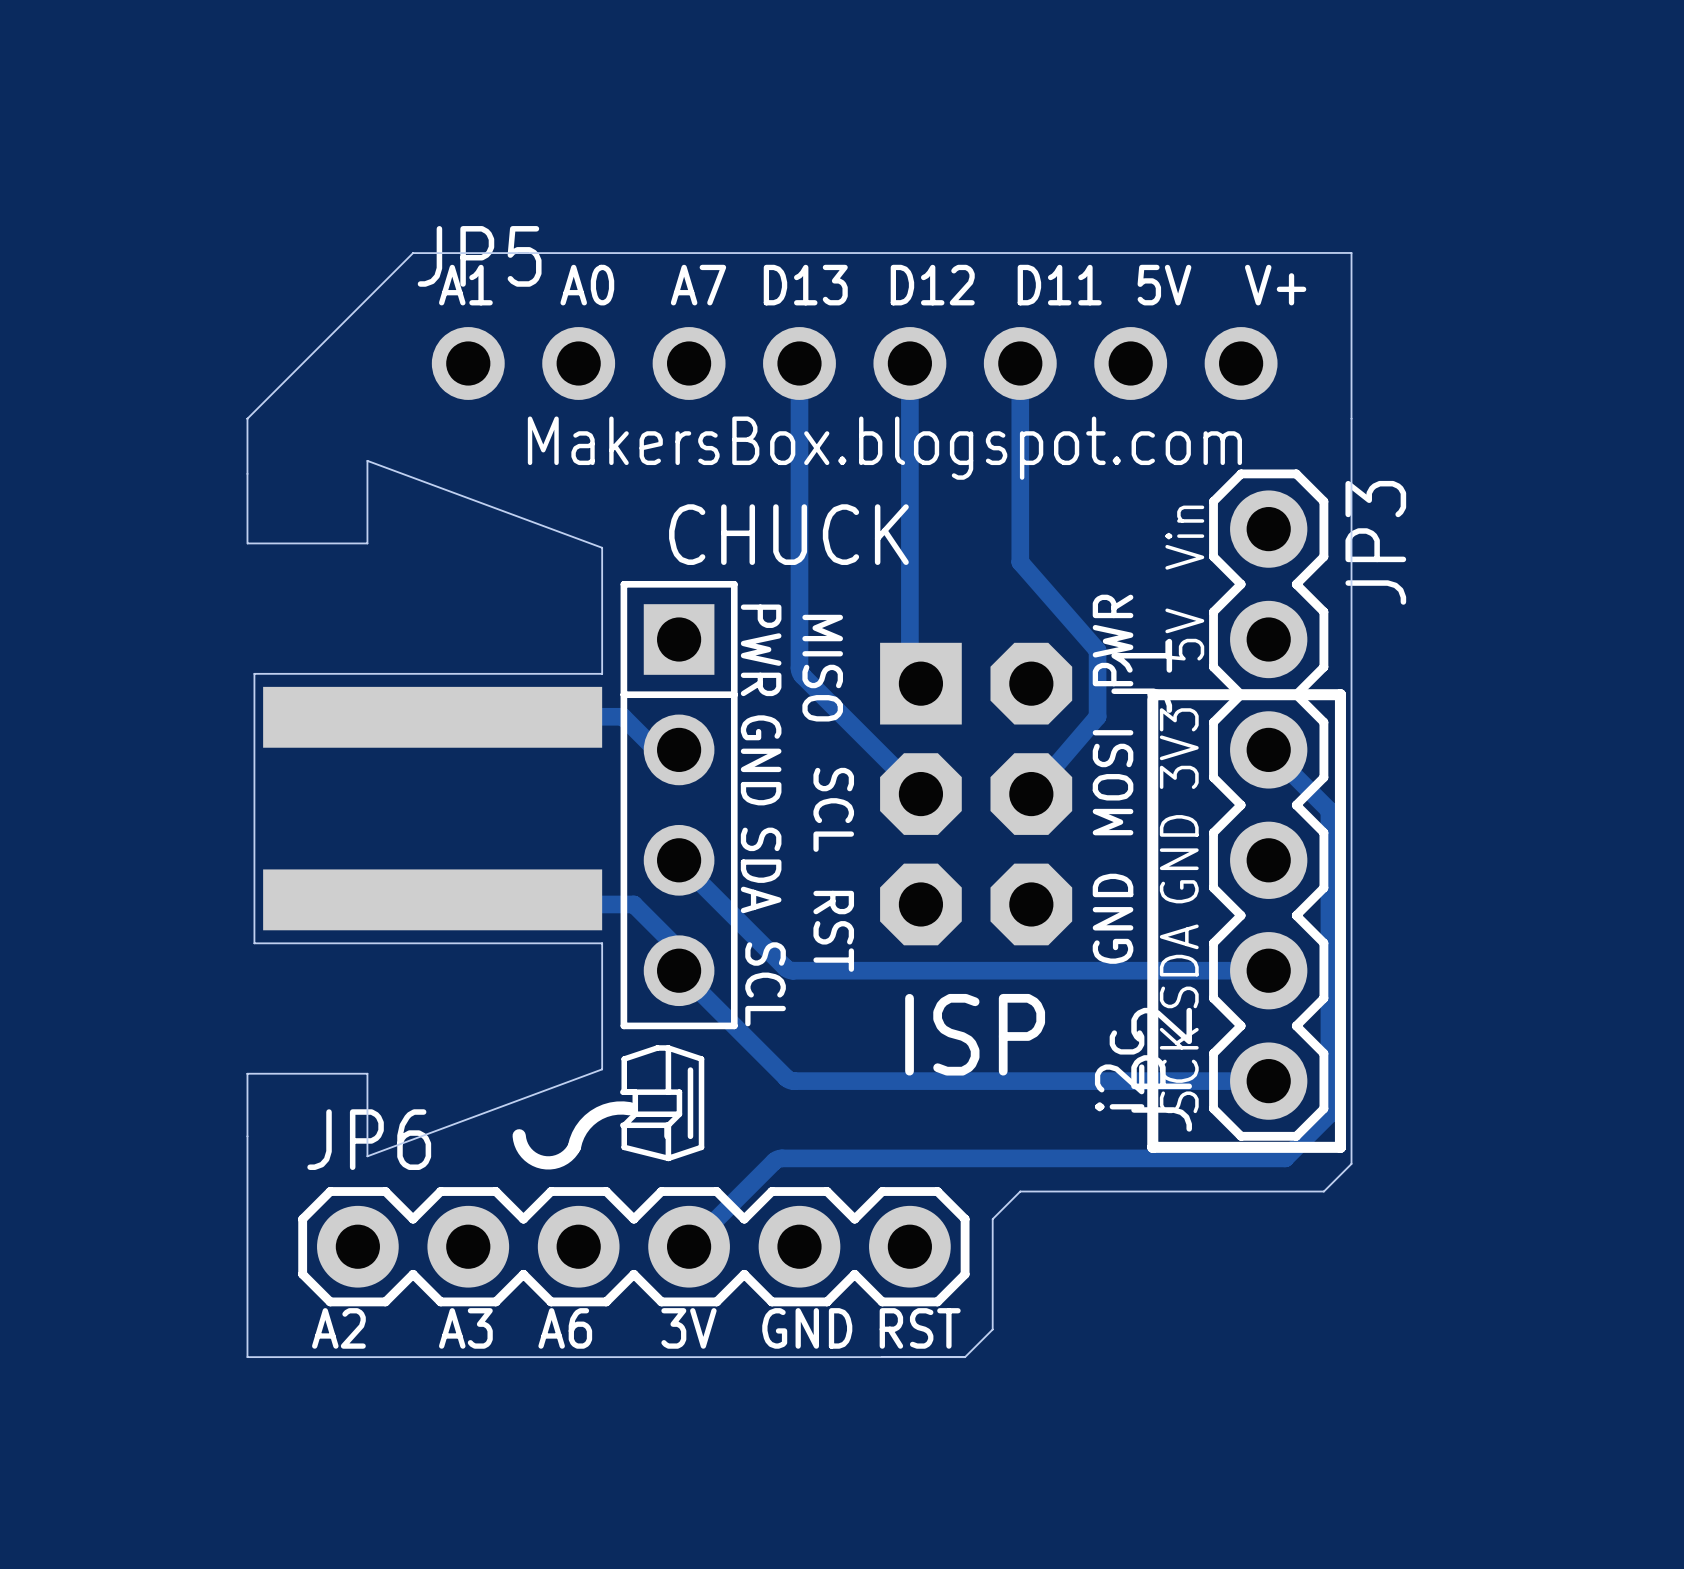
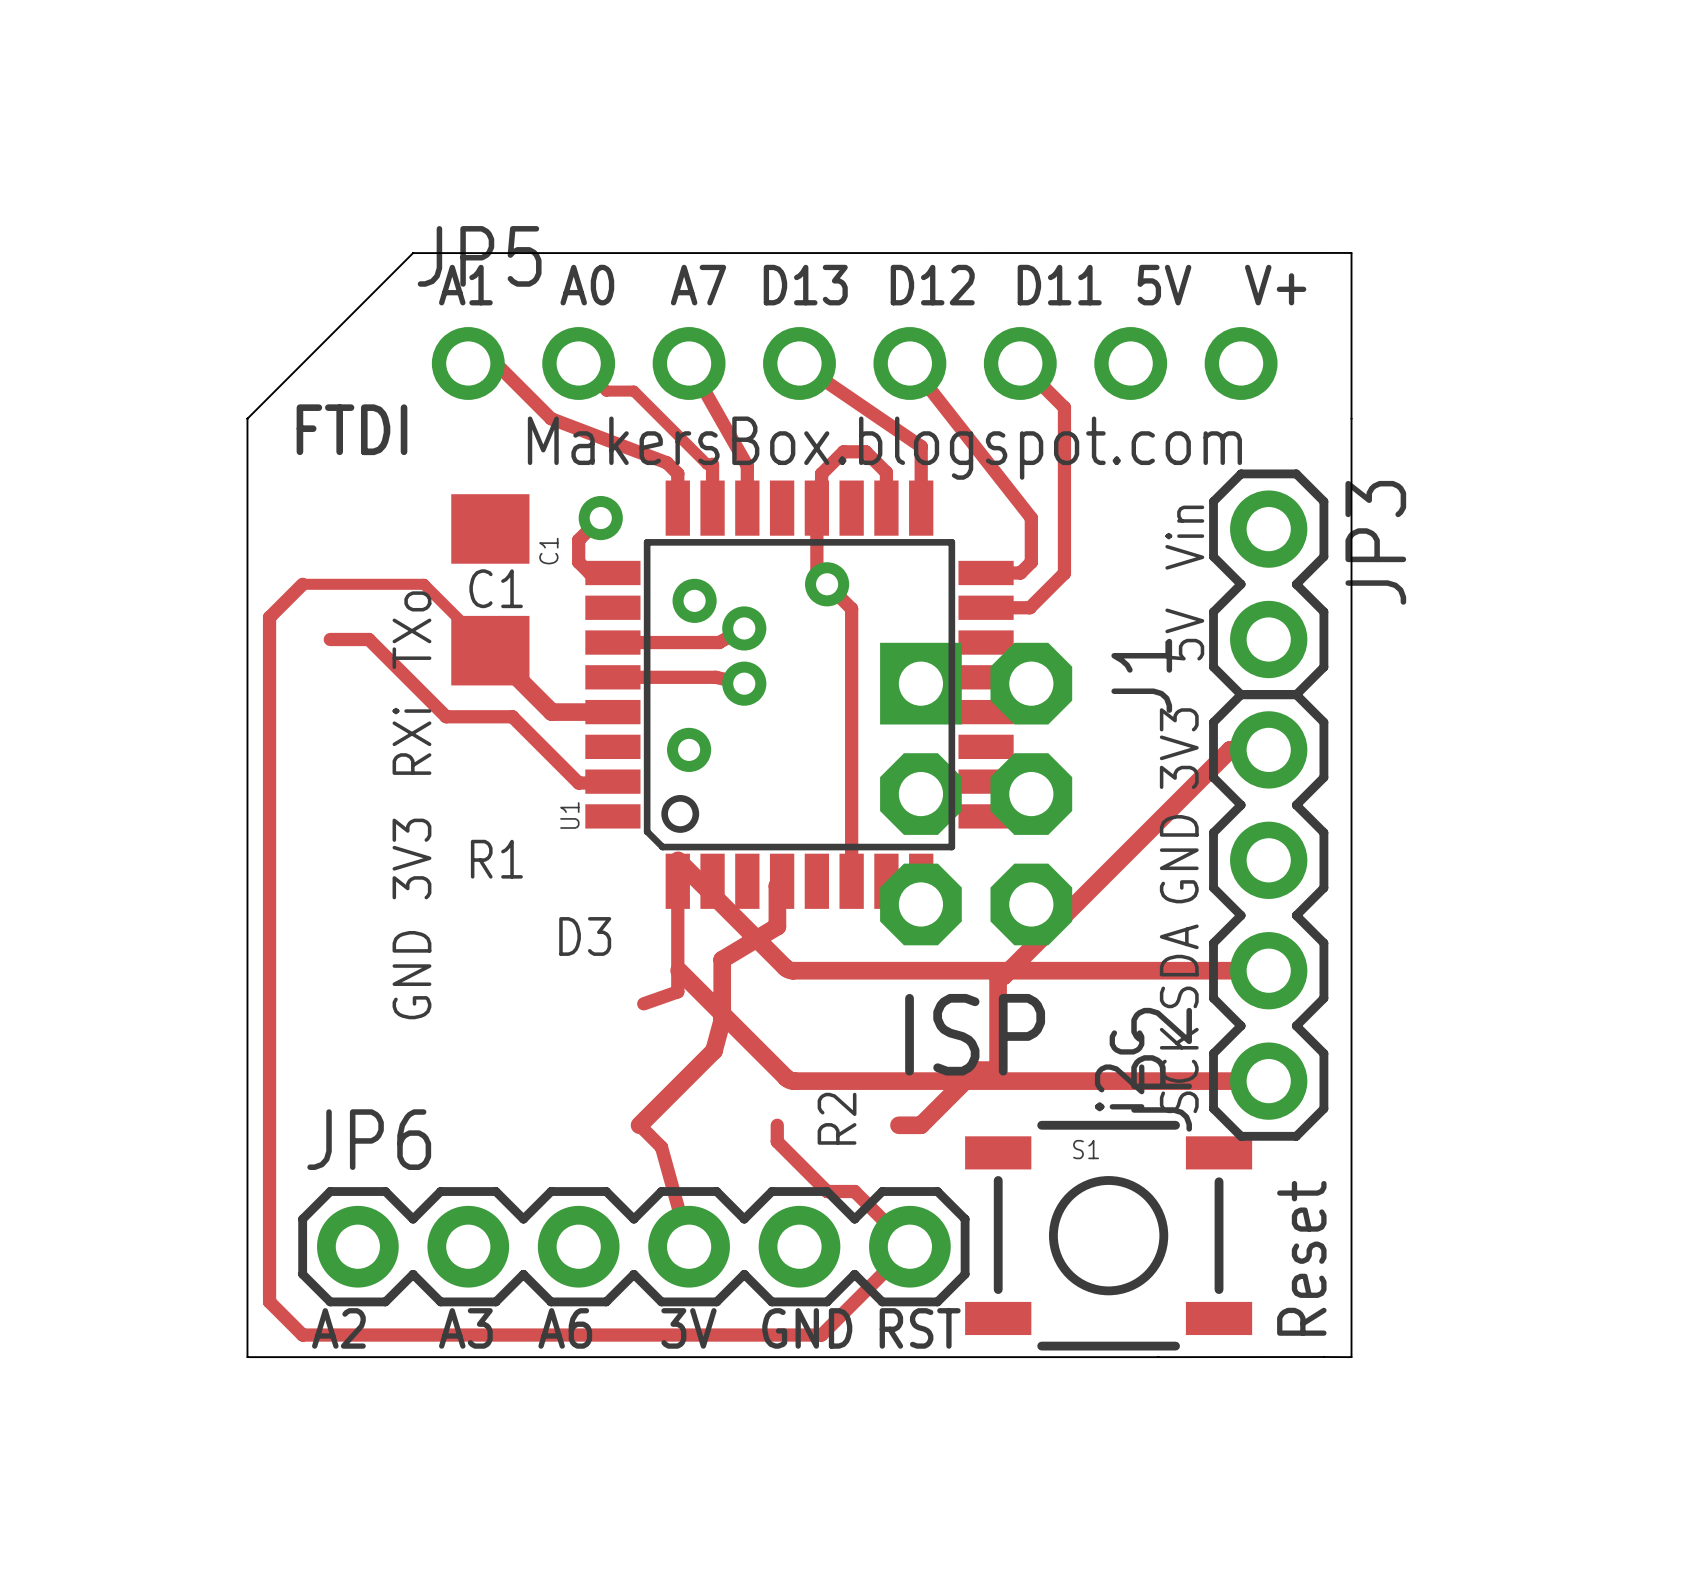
track: none -> (468, 363) (495, 363) (551, 418) (667, 462) (677, 473) (677, 508)
track: none -> (578, 363) (606, 391) (633, 391) (707, 464) (712, 464) (712, 508)
track: none -> (689, 363) (747, 465) (747, 508)
track: (799, 363) (799, 670) (920, 794) -> (799, 363) (921, 446) (921, 508)
track: (909, 363) (909, 668) (912, 674) (920, 683) -> (909, 363) (1031, 518) (1031, 562) (1020, 573) (986, 573)
track: (1020, 363) (1020, 562) (1097, 650) (1097, 716) (1031, 794) -> (1020, 363) (1064, 407) (1064, 573) (1029, 607) (986, 607)
text: none -> FTDI (351, 429)
board edge: none -> (247, 473) (247, 1136)
track: none -> (886, 508) (886, 472) (865, 451) (843, 451) (821, 473) (821, 503) (816, 508) (816, 574) (851, 608) (851, 881)
track: none -> (600, 518) (578, 540) (578, 562) (589, 573) (612, 573)
via: none -> (600, 518)
via: none -> (827, 584)
text: none -> C1 (496, 588)
C1: none -> (490, 589)
via: none -> (694, 600)
track: none -> (744, 628) (719, 642) (612, 642)
via: none -> (744, 628)
text: none -> TXo (411, 630)
track: none -> (330, 639) (368, 639) (446, 716) (512, 716) (578, 783) (612, 781)
text: PWR (1113, 640) -> none
text: MISO (822, 668) -> none
track: none -> (612, 677) (715, 677) (744, 683)
via: none -> (744, 683)
U1: none -> (799, 694)
line: (1152, 694) (1340, 694) (1340, 1147) (1152, 1147) (1152, 699) -> none
track: none -> (612, 712) (551, 712) (423, 584) (302, 584) (269, 617) (269, 1301) (302, 1335) (821, 1335) (909, 1246) (854, 1191) (827, 1191) (777, 1141) (777, 1125)
text: none -> RXi (411, 741)
via: none -> (689, 749)
track: (1268, 749) (1329, 810) (1329, 1114) (1285, 1158) (780, 1158) (774, 1161) (689, 1246) -> (1268, 749) (1230, 749) (1003, 976) (998, 976) (998, 1070) (976, 1070) (920, 1125) (898, 1125)
text: MOSI (1113, 782) -> none
text: SCL (833, 809) -> none
CHUCK: (492, 815) -> none
text: none -> 3V3 (411, 858)
text: none -> R1 (496, 859)
track: none -> (677, 881) (677, 991) (643, 1003)
track: none -> (777, 915) (777, 876) (782, 881) (777, 885) (777, 926) (722, 959) (722, 1020) (713, 1050) (639, 1125) (661, 1147) (689, 1246)
text position: GND (1113, 918) -> GND (411, 975)
text: RST (833, 931) -> none
text: none -> D3 (585, 936)
text: none -> R2 (837, 1118)
board edge: (1351, 1163) (1323, 1191) (1020, 1191) (992, 1219) (992, 1329) (965, 1357) (882, 1357) (909, 1357) -> (1351, 1163) (1351, 1357) (965, 1357)
S1: none -> (1108, 1235)
text: none -> Reset (1301, 1258)

